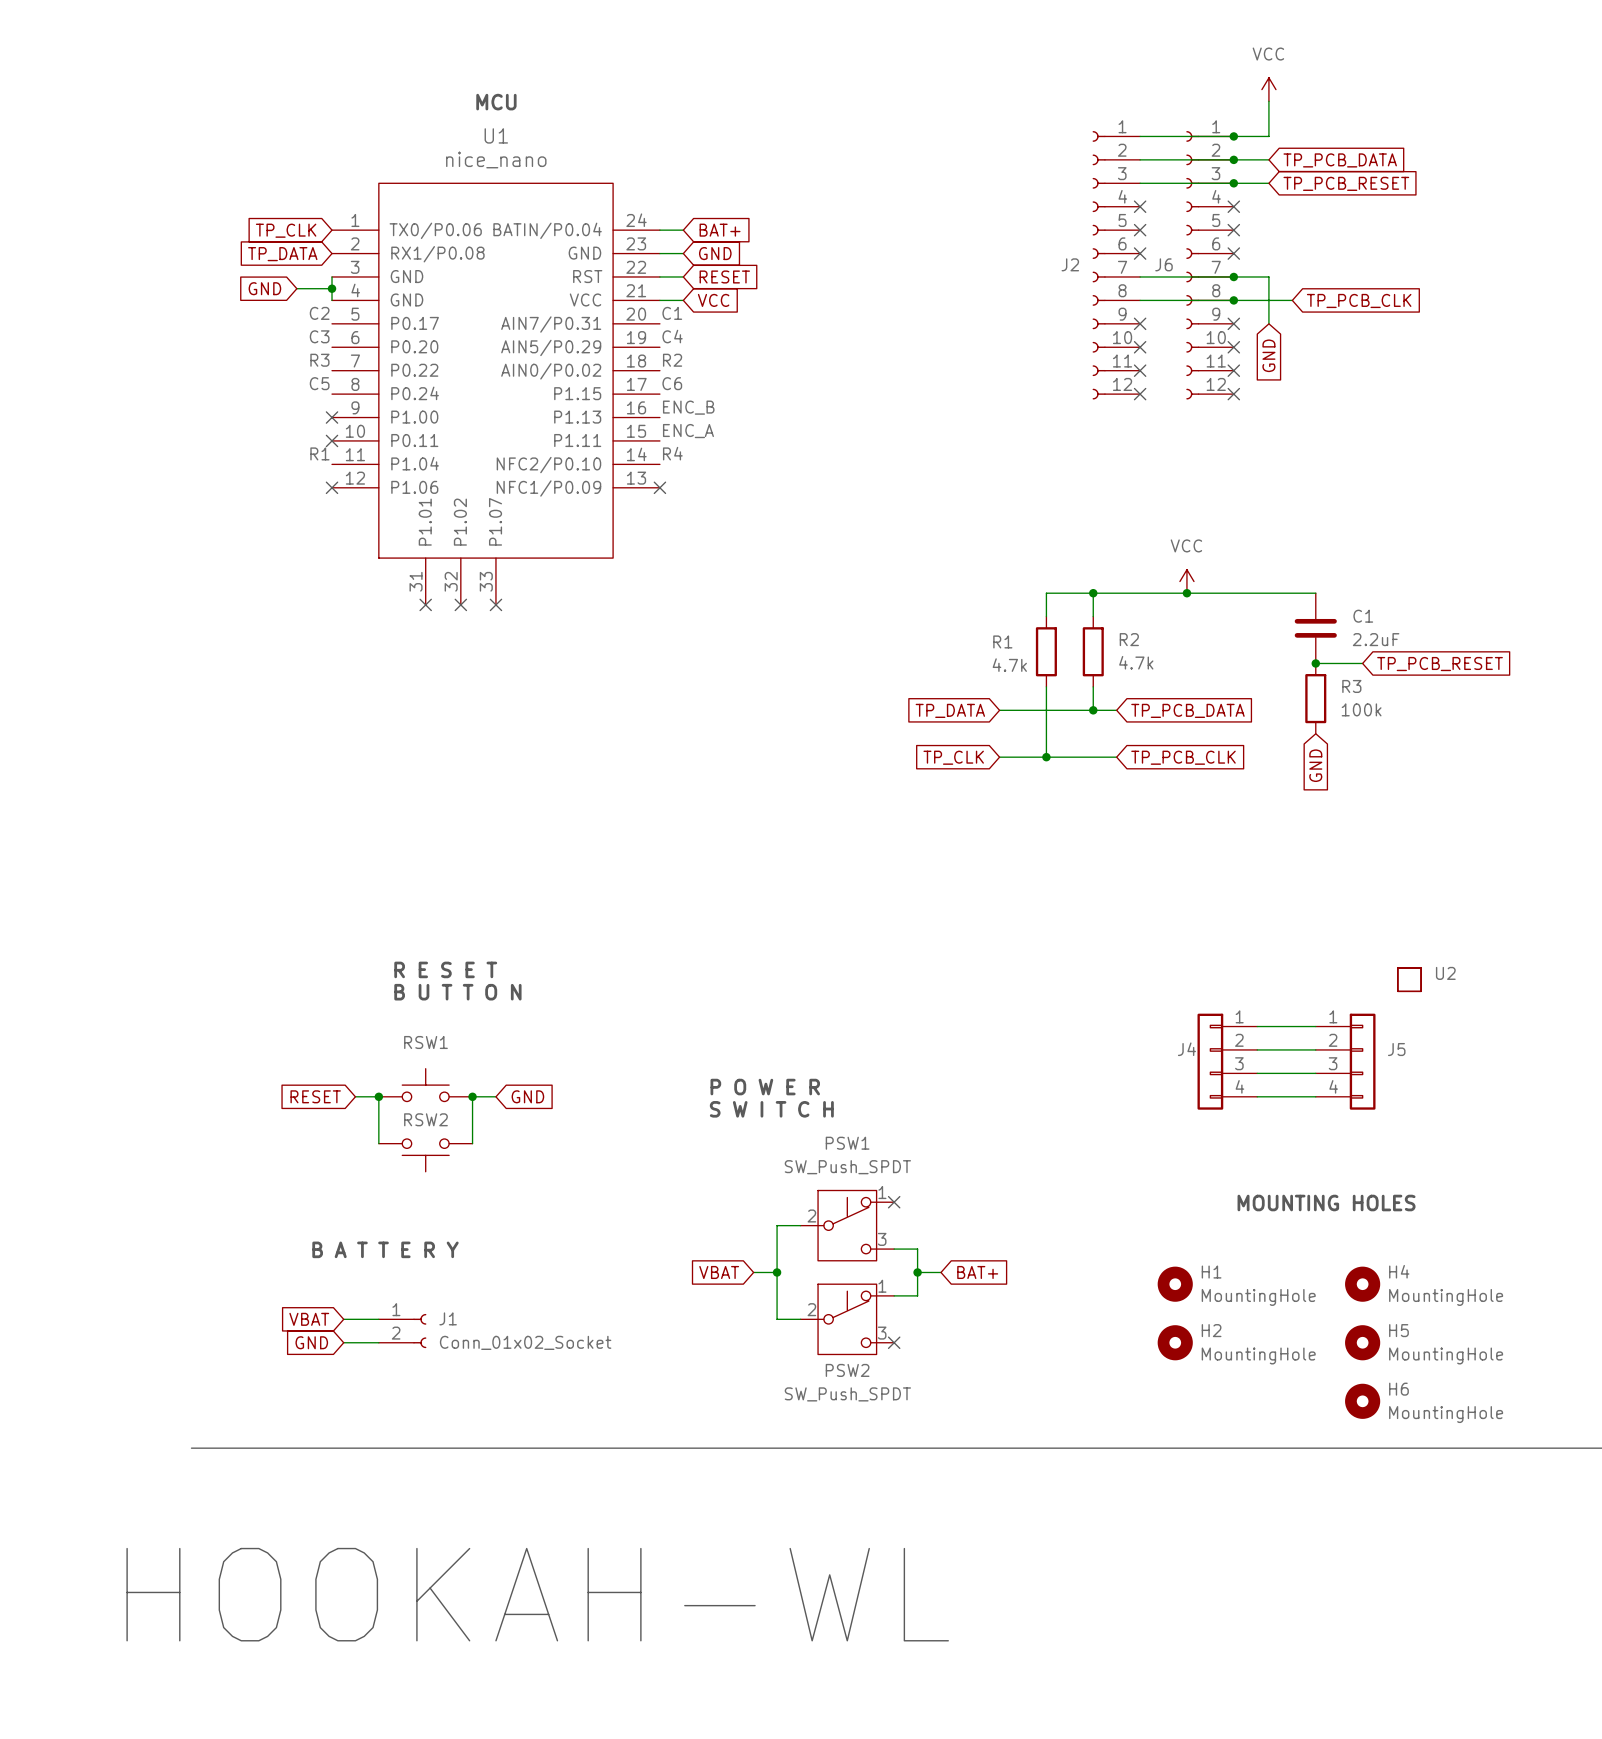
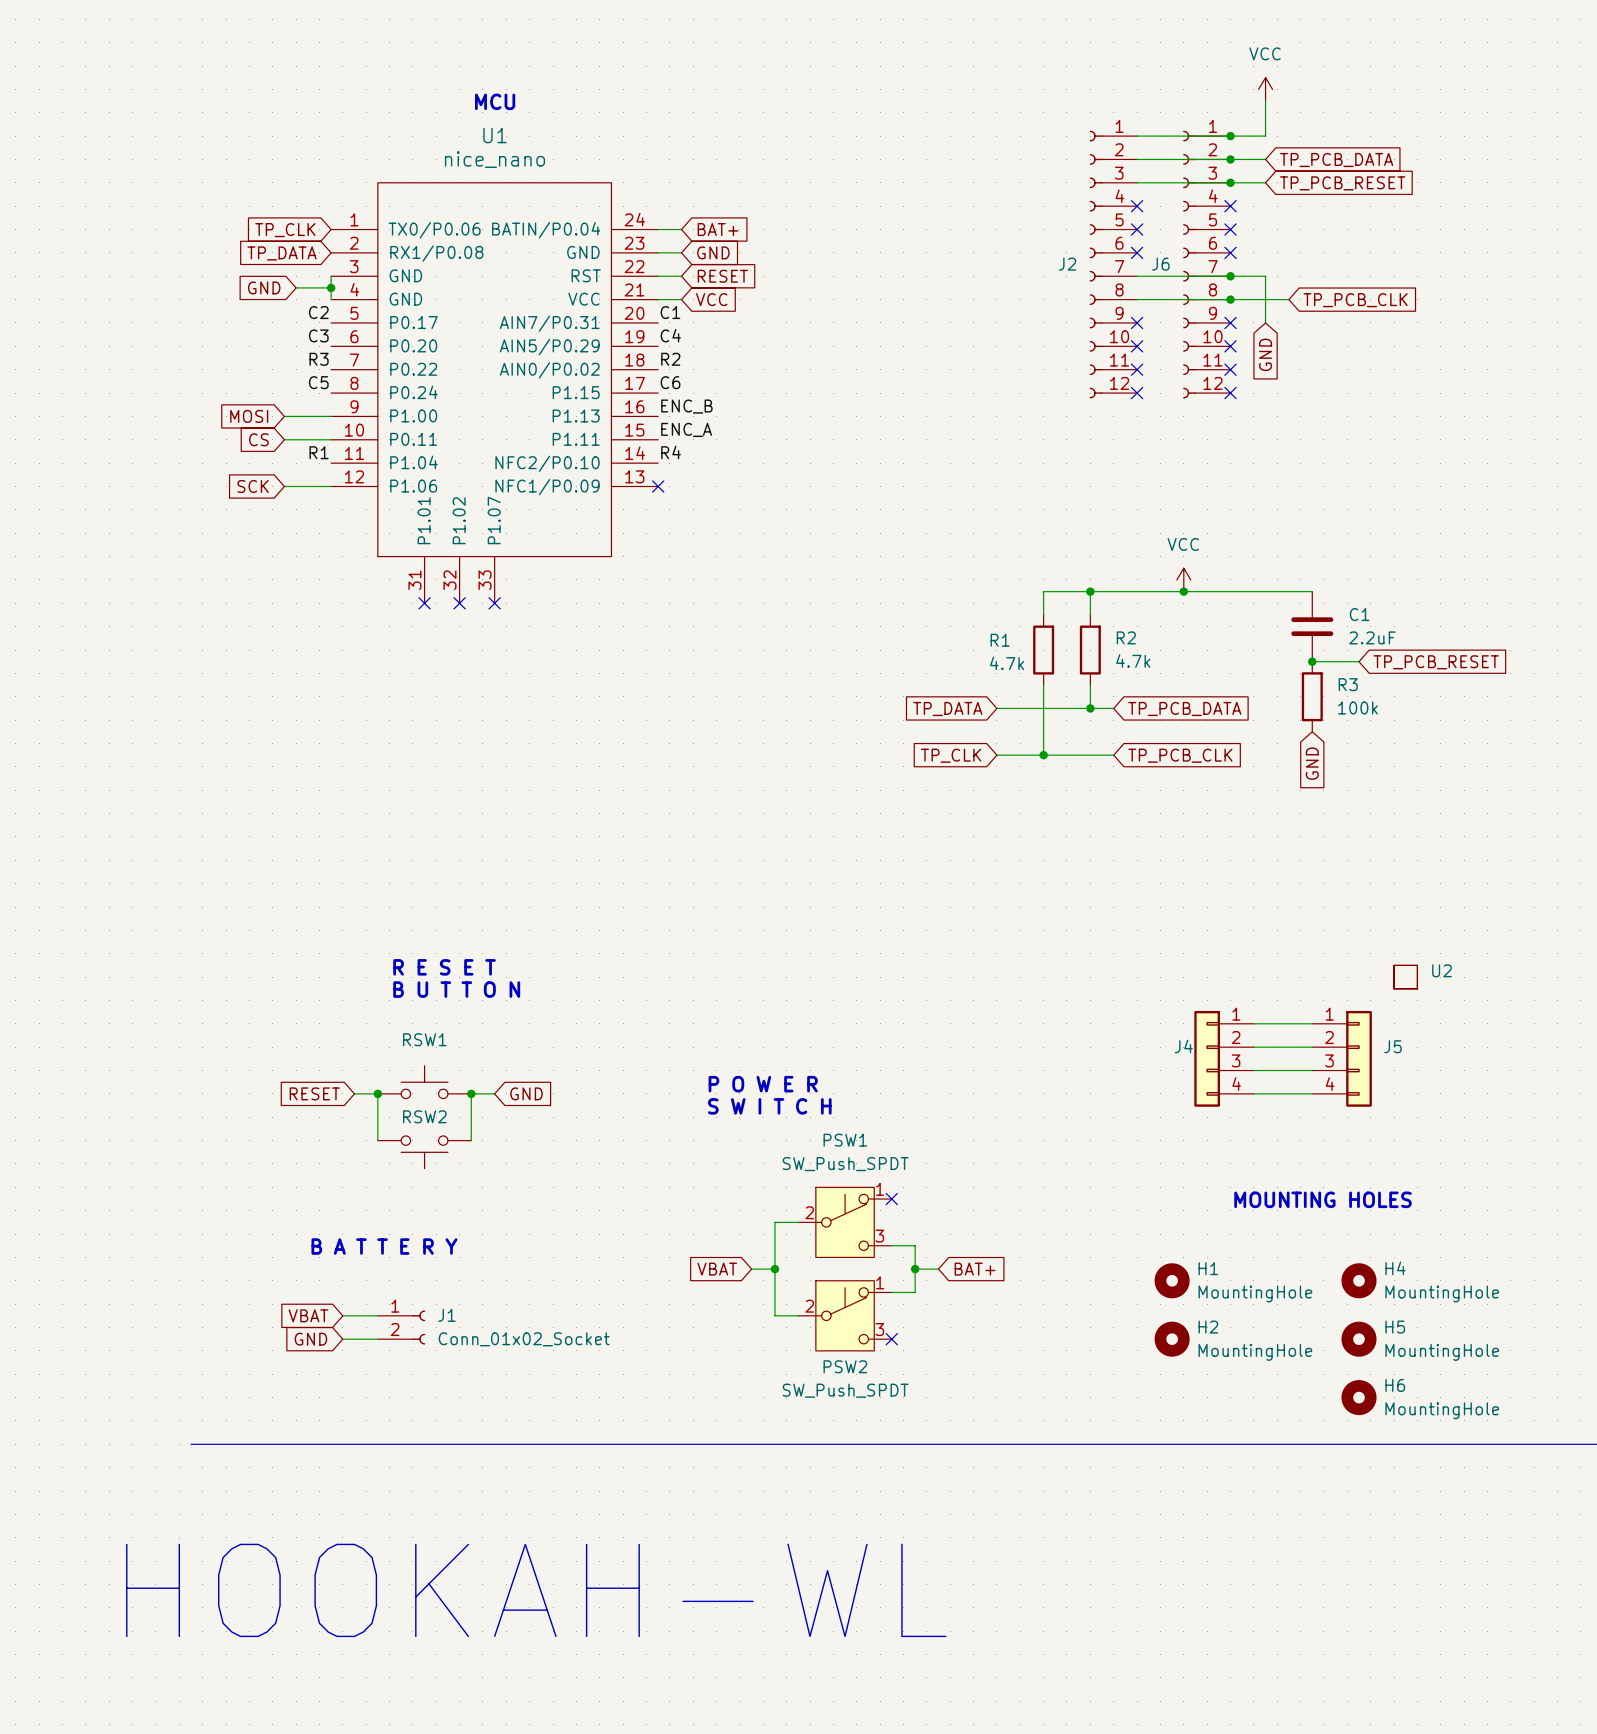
global label: none -> MOSI (249, 416)
wire: none -> (284, 416) (331, 416)
no-connect mark: (332, 417) -> none
global label: none -> CS (258, 439)
wire: none -> (284, 439) (331, 439)
no-connect mark: (332, 440) -> none
global label: none -> SCK (253, 486)
wire: none -> (284, 486) (331, 486)
no-connect mark: (332, 487) -> none

